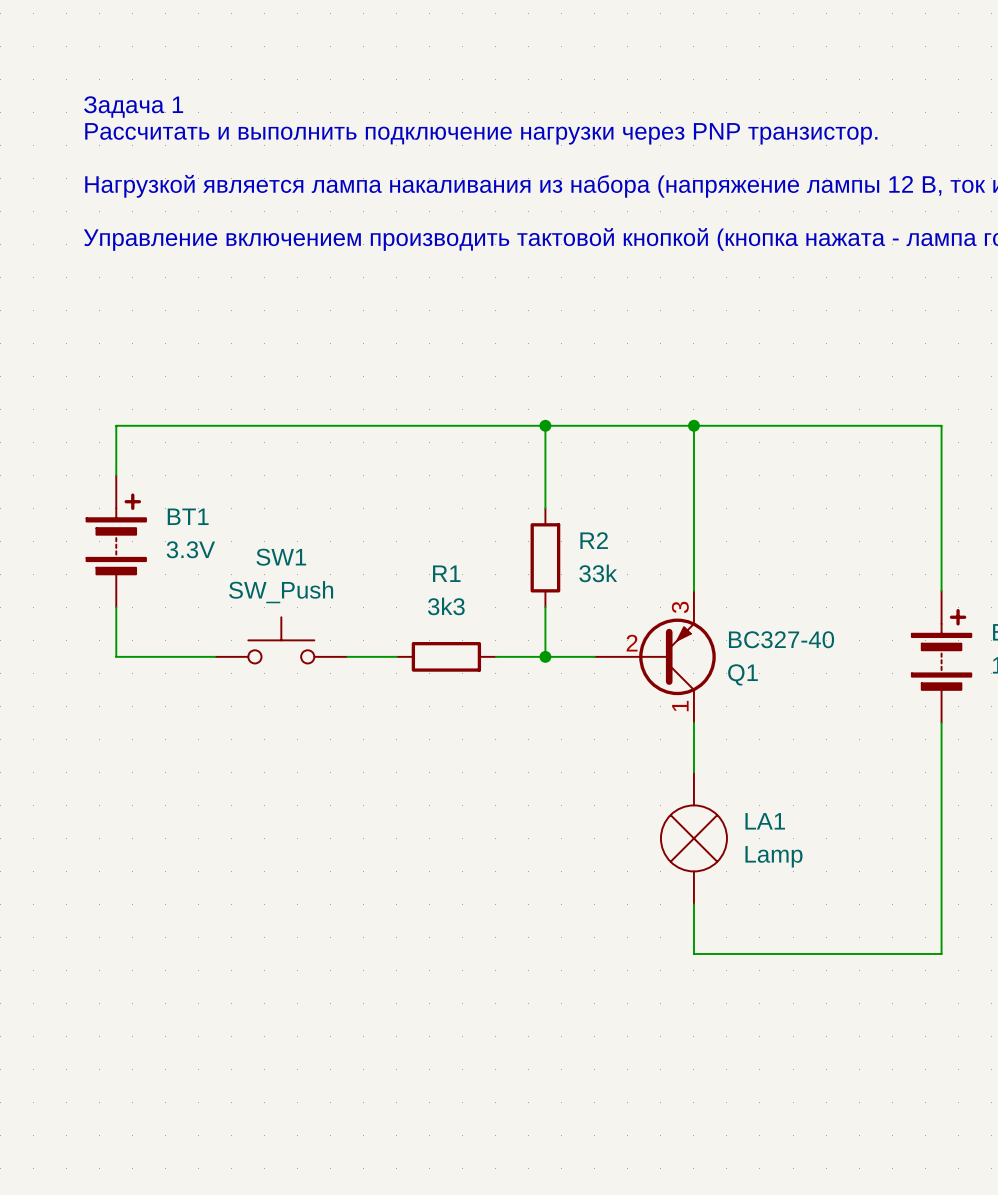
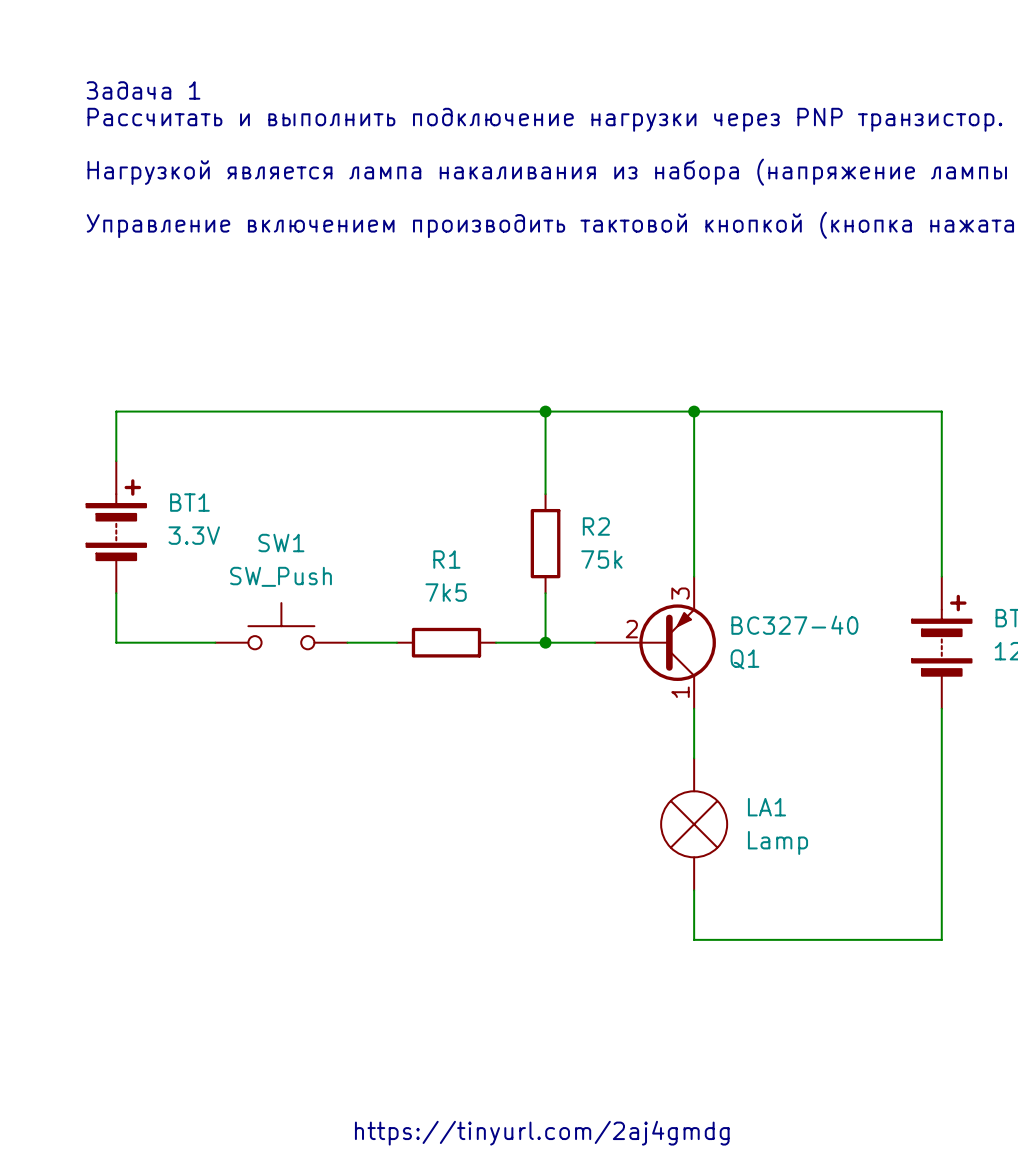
R2 value: 33k (598, 573) -> 75k (601, 559)
R1 value: 3k3 (446, 606) -> 7k5 (446, 592)
text: none -> https://tinyurl.com/2aj4gmdg (542, 1133)

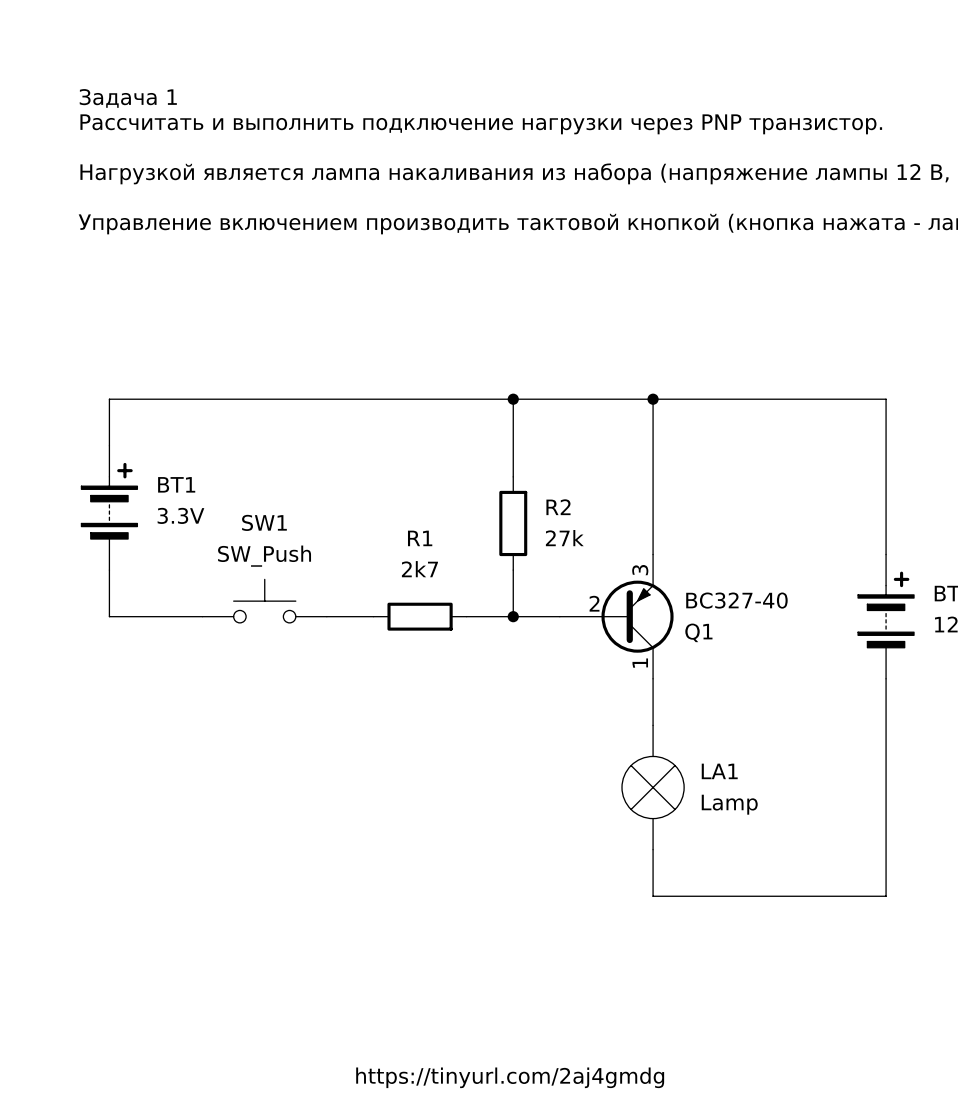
R2 value: 75k (601, 559) -> 27k (564, 538)
R1 value: 7k5 (446, 592) -> 2k7 (419, 569)

